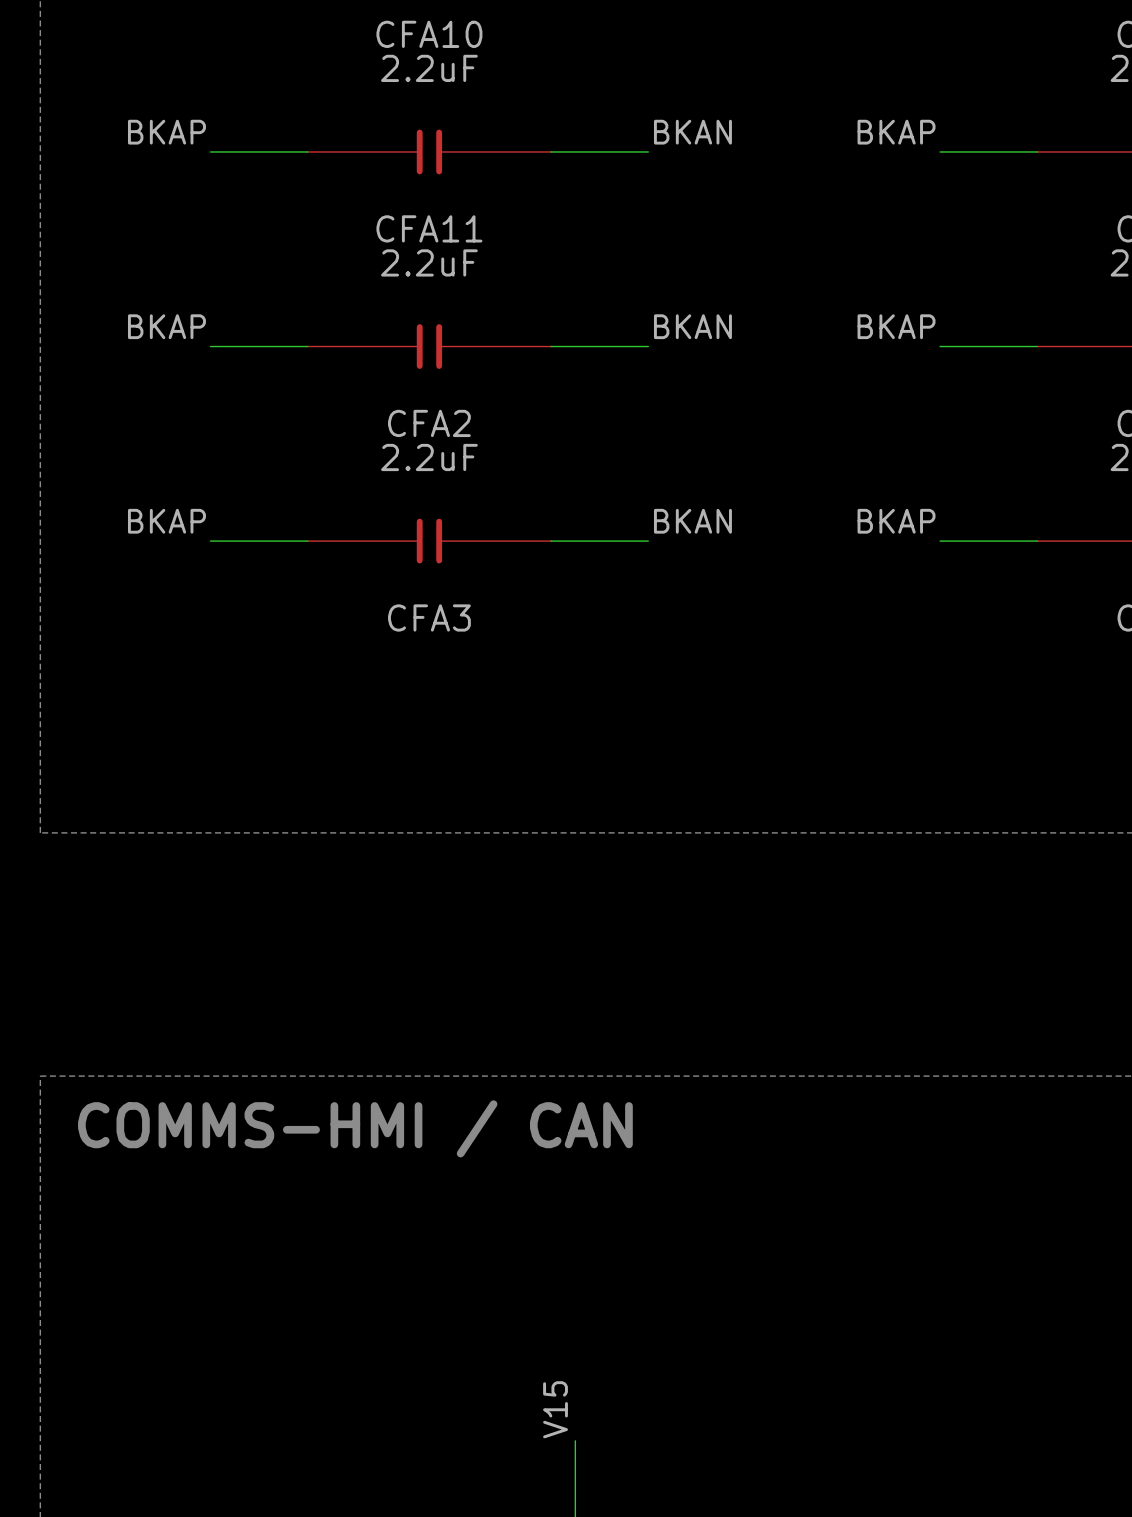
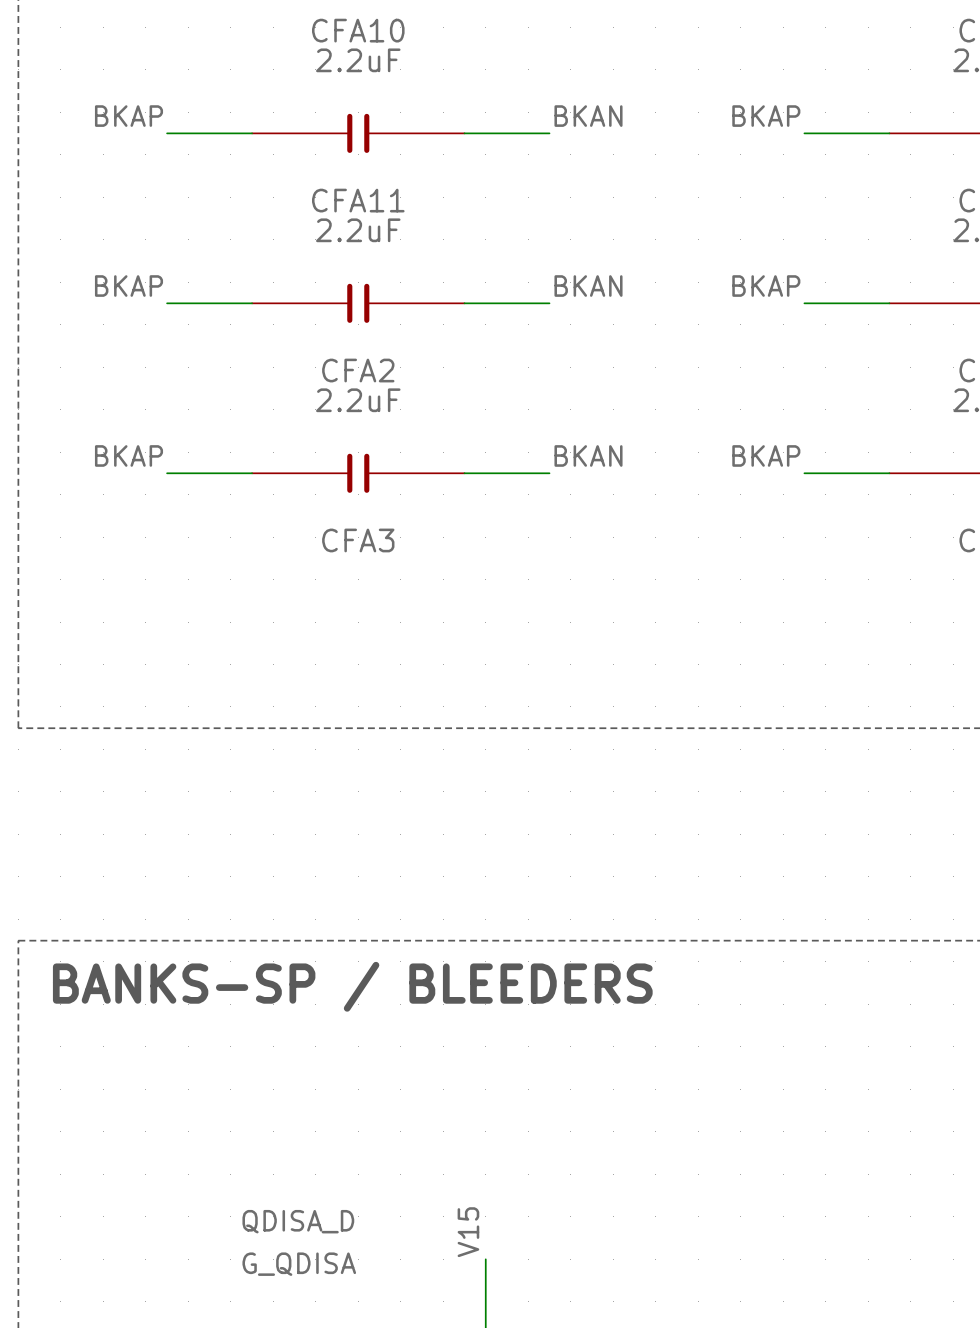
text: COMMS-HMI / CAN (355, 1128) -> BANKS-SP / BLEEDERS (352, 986)
label: none -> QDISA_D (298, 1221)
label: none -> G_QDISA (299, 1264)

